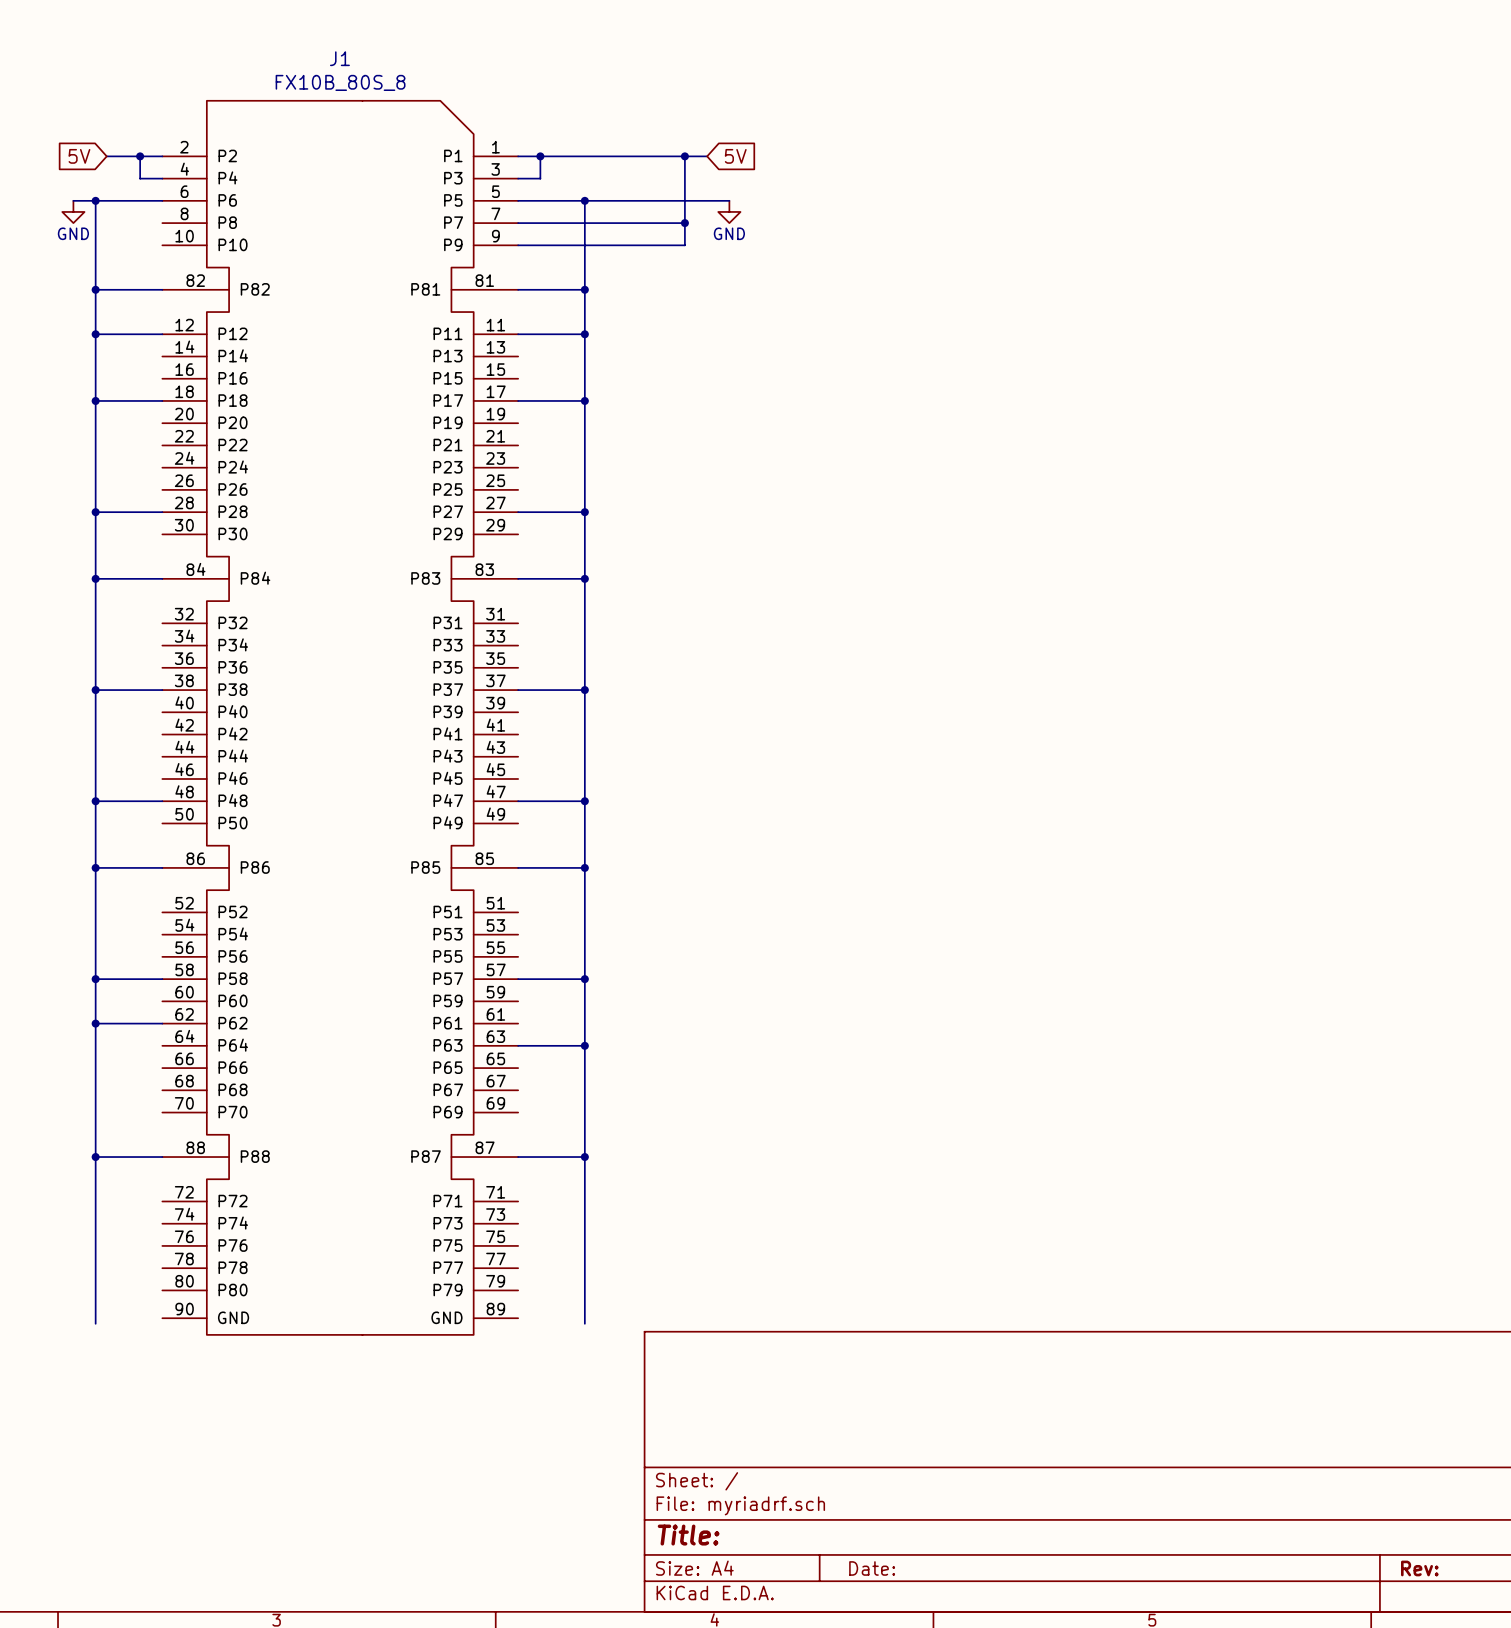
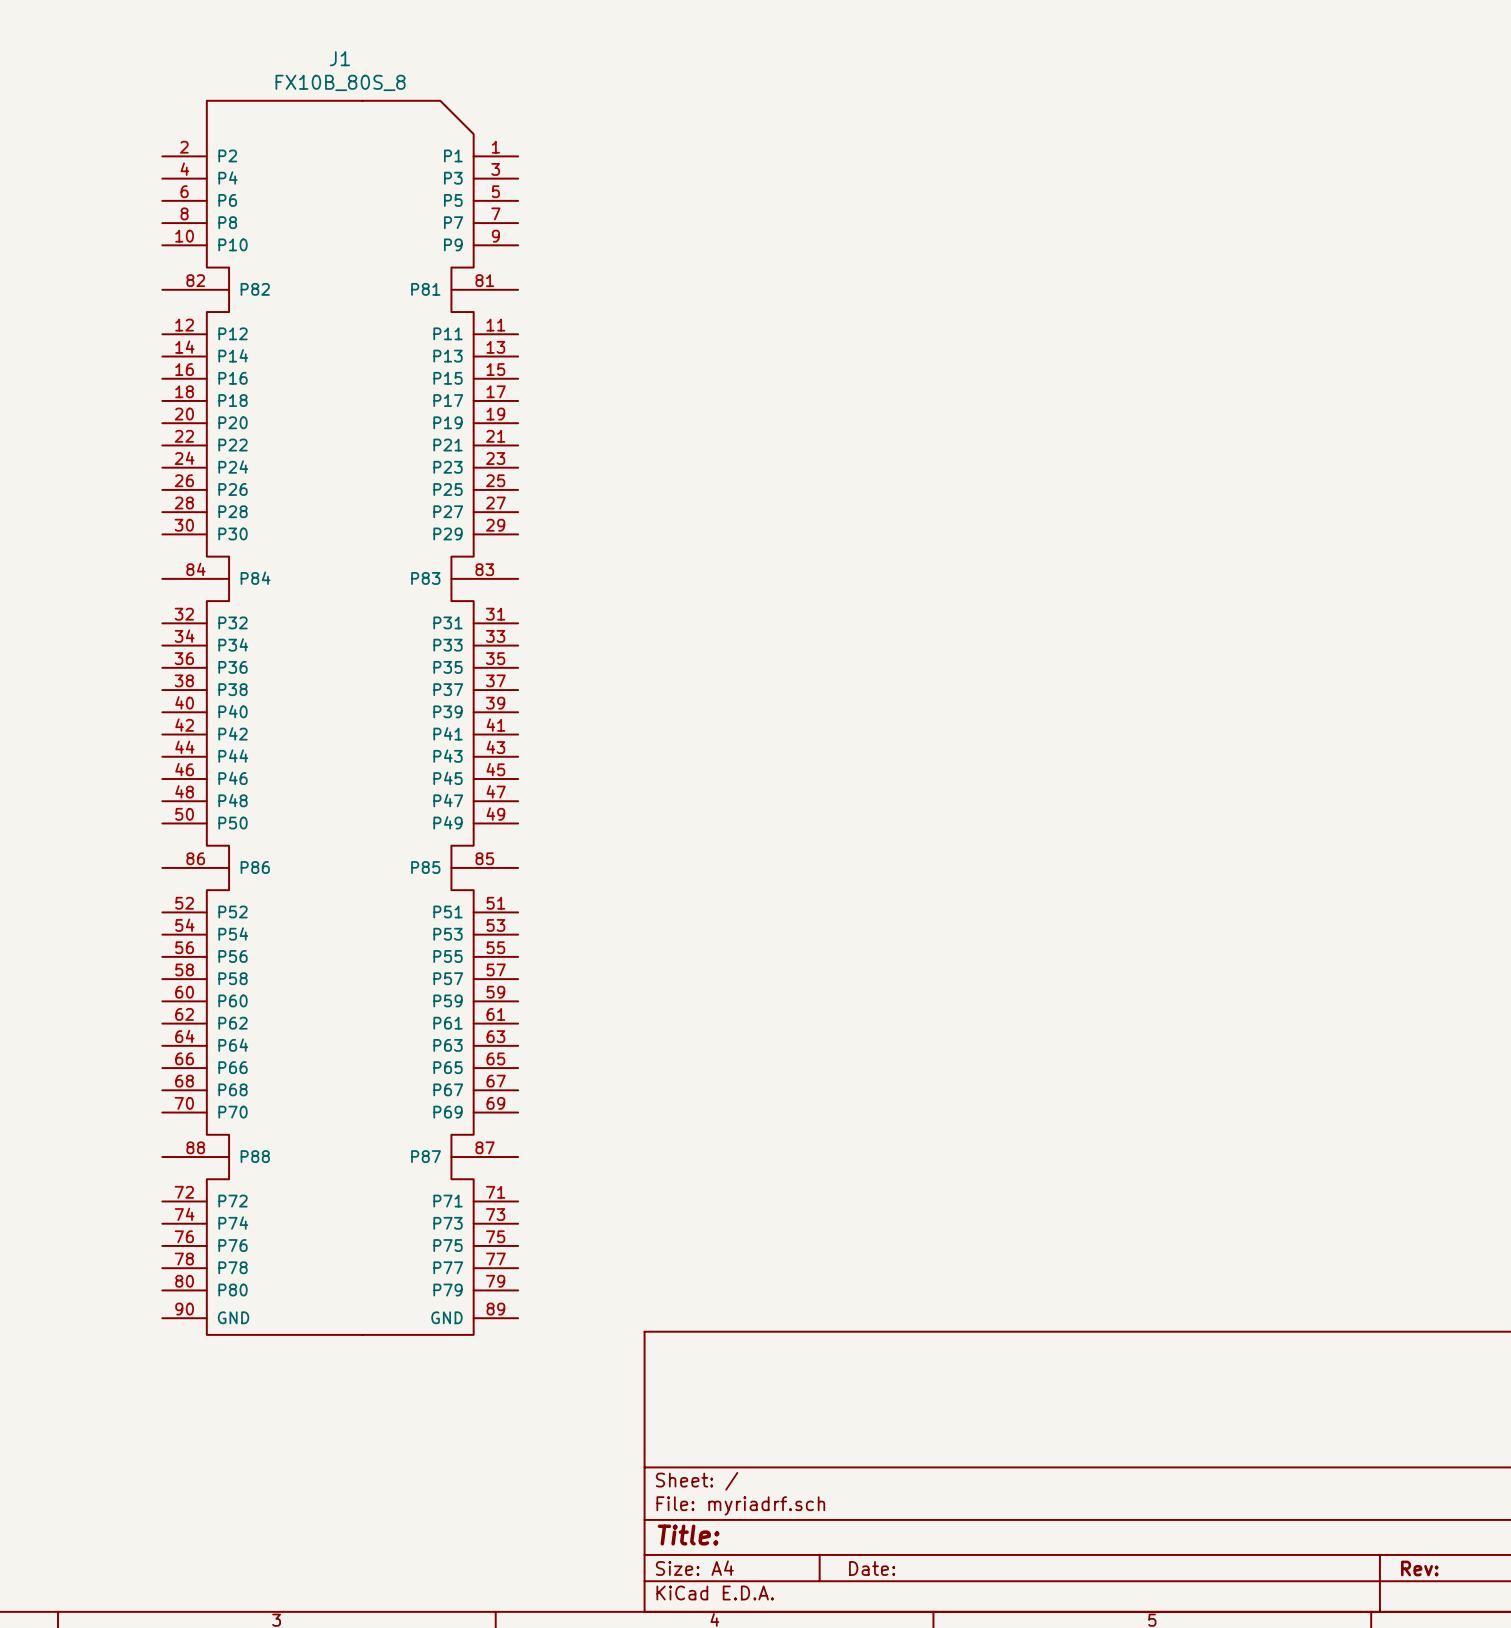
global label: 5V (79, 156) -> none
wire: (106, 156) (162, 156) -> none
wire: (140, 156) (140, 178) (162, 178) -> none
junction: (140, 156) -> none
wire: (518, 156) (707, 156) -> none
wire: (540, 156) (540, 178) (518, 178) -> none
junction: (540, 156) -> none
wire: (684, 156) (684, 245) (518, 245) -> none
junction: (684, 156) -> none
global label: 5V (735, 156) -> none
wire: (73, 200) (162, 200) -> none
wire: (95, 200) (95, 1323) -> none
junction: (95, 200) -> none
wire: (518, 200) (729, 200) -> none
wire: (584, 200) (584, 1323) -> none
junction: (584, 200) -> none
power symbol: GND (73, 211) -> none
power symbol: GND (729, 211) -> none
wire: (518, 223) (684, 223) -> none
junction: (684, 223) -> none
wire: (95, 289) (162, 289) -> none
junction: (95, 289) -> none
wire: (518, 289) (584, 289) -> none
junction: (584, 289) -> none
wire: (95, 334) (162, 334) -> none
junction: (95, 334) -> none
wire: (518, 334) (584, 334) -> none
junction: (584, 334) -> none
wire: (95, 400) (162, 400) -> none
junction: (95, 400) -> none
wire: (518, 400) (584, 400) -> none
junction: (584, 400) -> none
wire: (95, 512) (162, 512) -> none
junction: (95, 512) -> none
wire: (518, 512) (584, 512) -> none
junction: (584, 512) -> none
wire: (95, 578) (162, 578) -> none
junction: (95, 578) -> none
wire: (518, 578) (584, 578) -> none
junction: (584, 578) -> none
wire: (95, 690) (162, 690) -> none
junction: (95, 690) -> none
wire: (518, 690) (584, 690) -> none
junction: (584, 690) -> none
wire: (95, 801) (162, 801) -> none
junction: (95, 801) -> none
wire: (518, 801) (584, 801) -> none
junction: (584, 801) -> none
wire: (95, 867) (162, 867) -> none
junction: (95, 867) -> none
wire: (518, 867) (584, 867) -> none
junction: (584, 867) -> none
wire: (95, 979) (162, 979) -> none
junction: (95, 979) -> none
wire: (518, 979) (584, 979) -> none
junction: (584, 979) -> none
wire: (95, 1023) (162, 1023) -> none
junction: (95, 1023) -> none
wire: (518, 1045) (584, 1045) -> none
junction: (584, 1045) -> none
wire: (95, 1157) (162, 1157) -> none
junction: (95, 1157) -> none
wire: (518, 1157) (584, 1157) -> none
junction: (584, 1157) -> none

